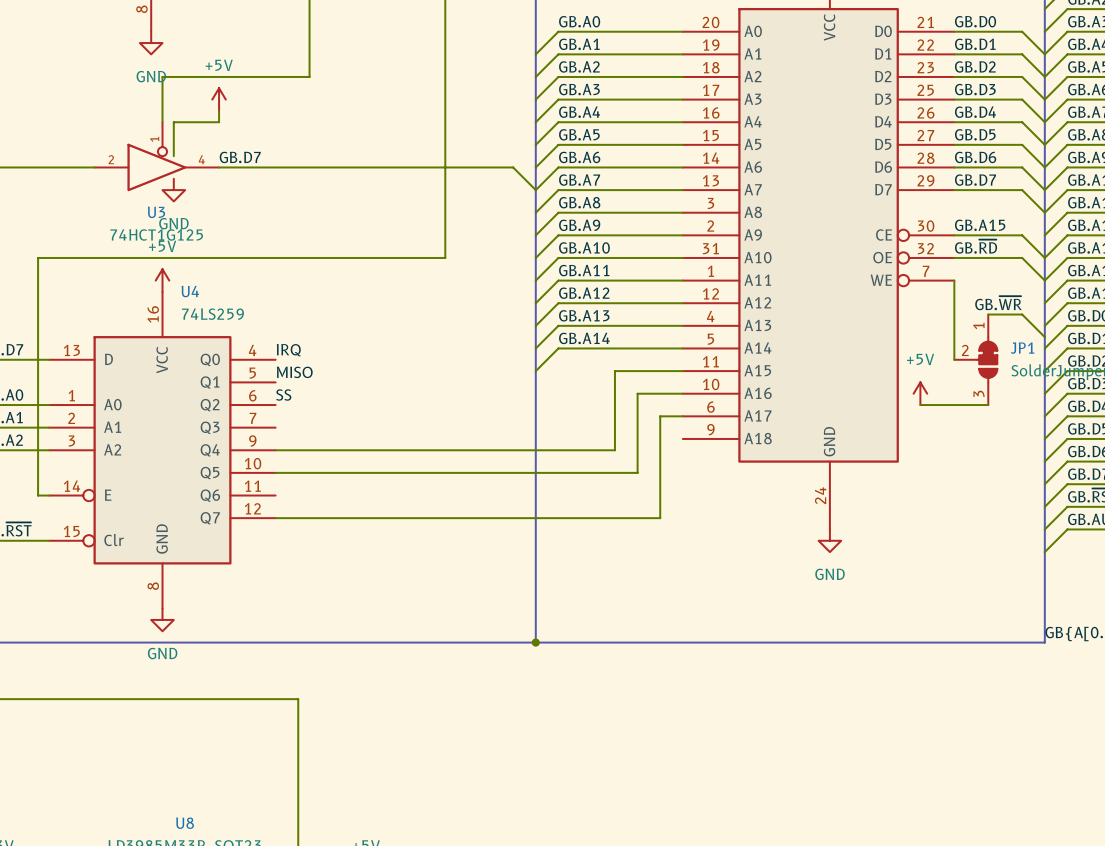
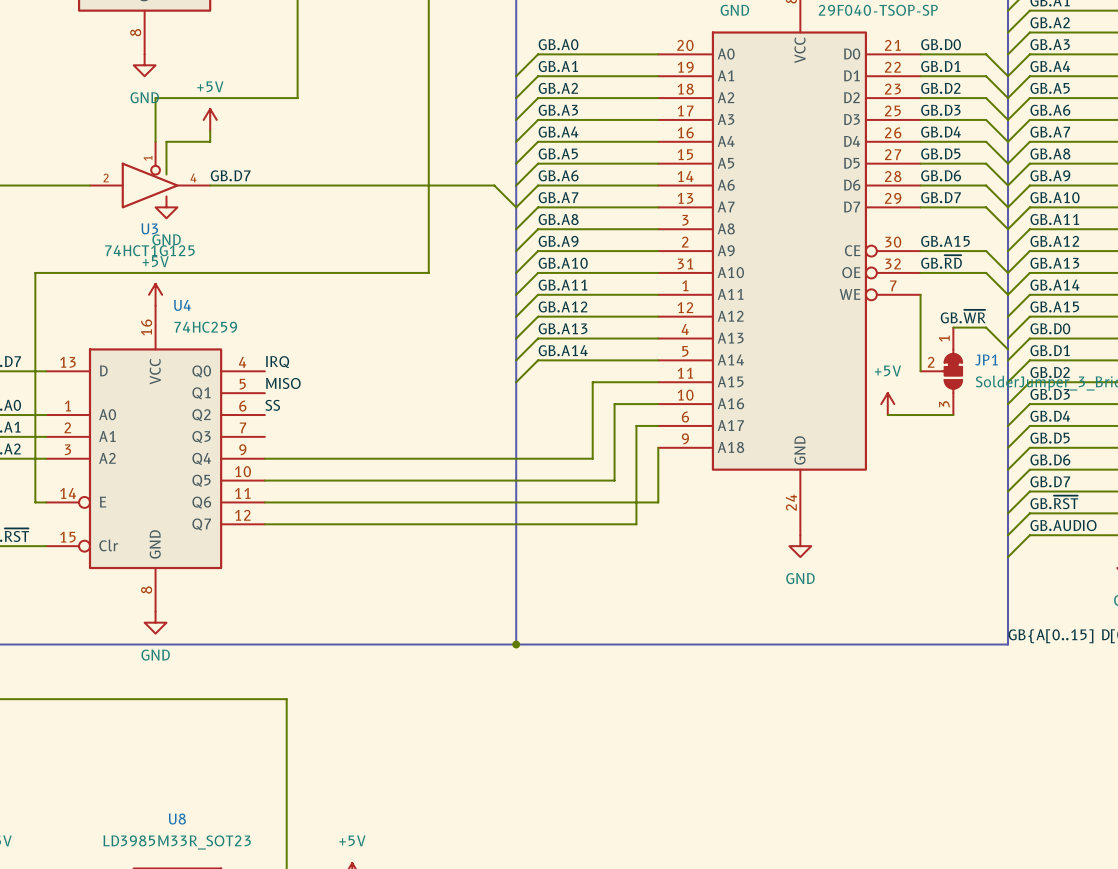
U4 value: 74LS259 (212, 314) -> 74HC259 (205, 327)
wire: none -> (658, 447) (658, 502) (264, 502)

